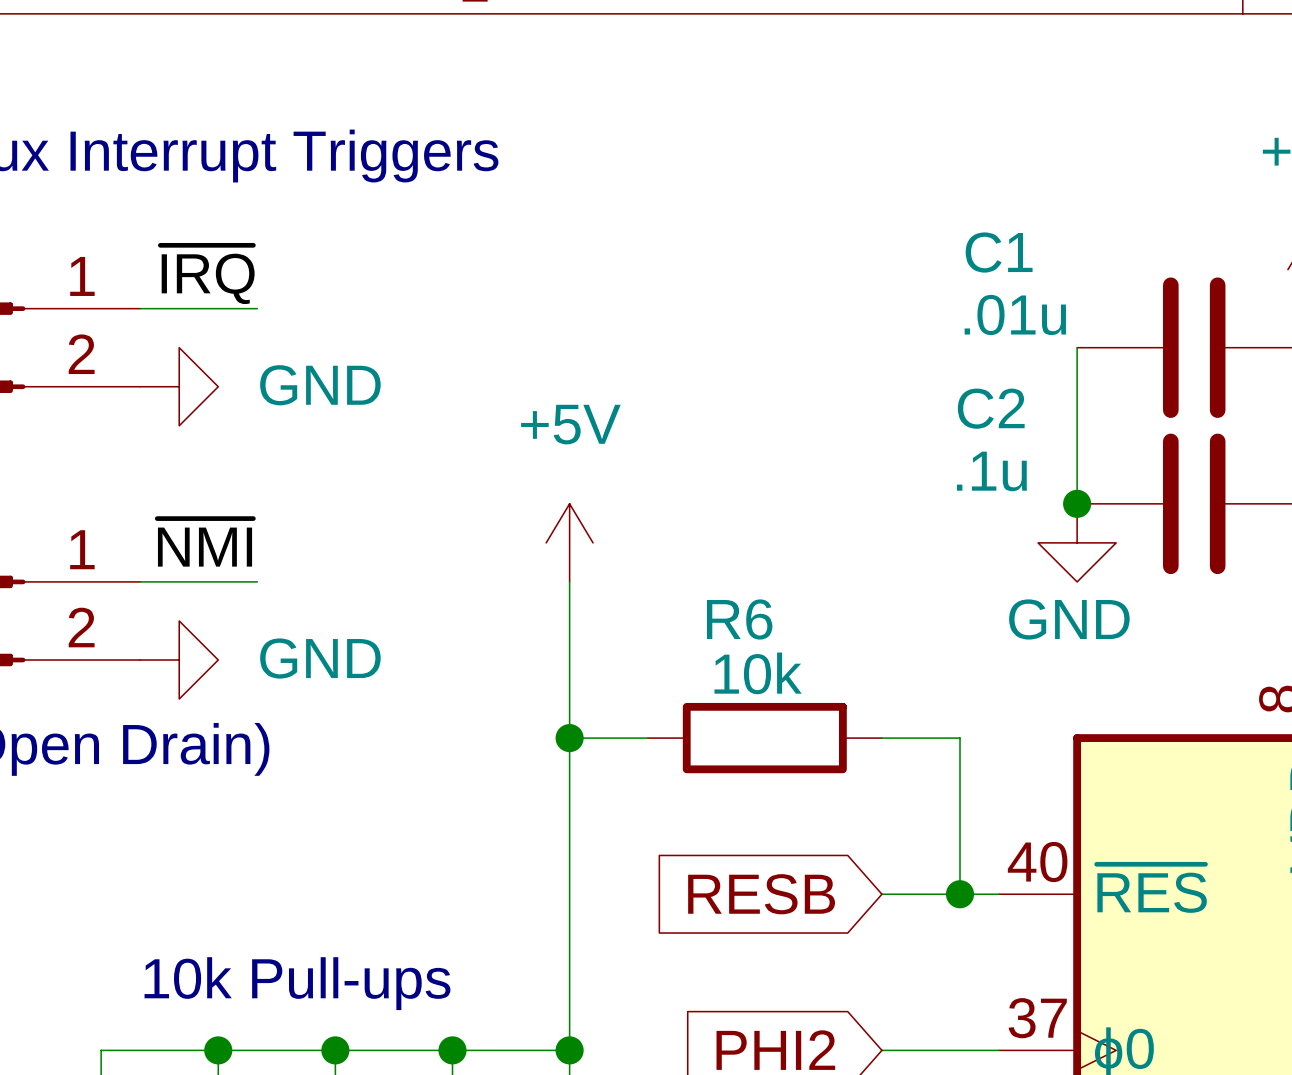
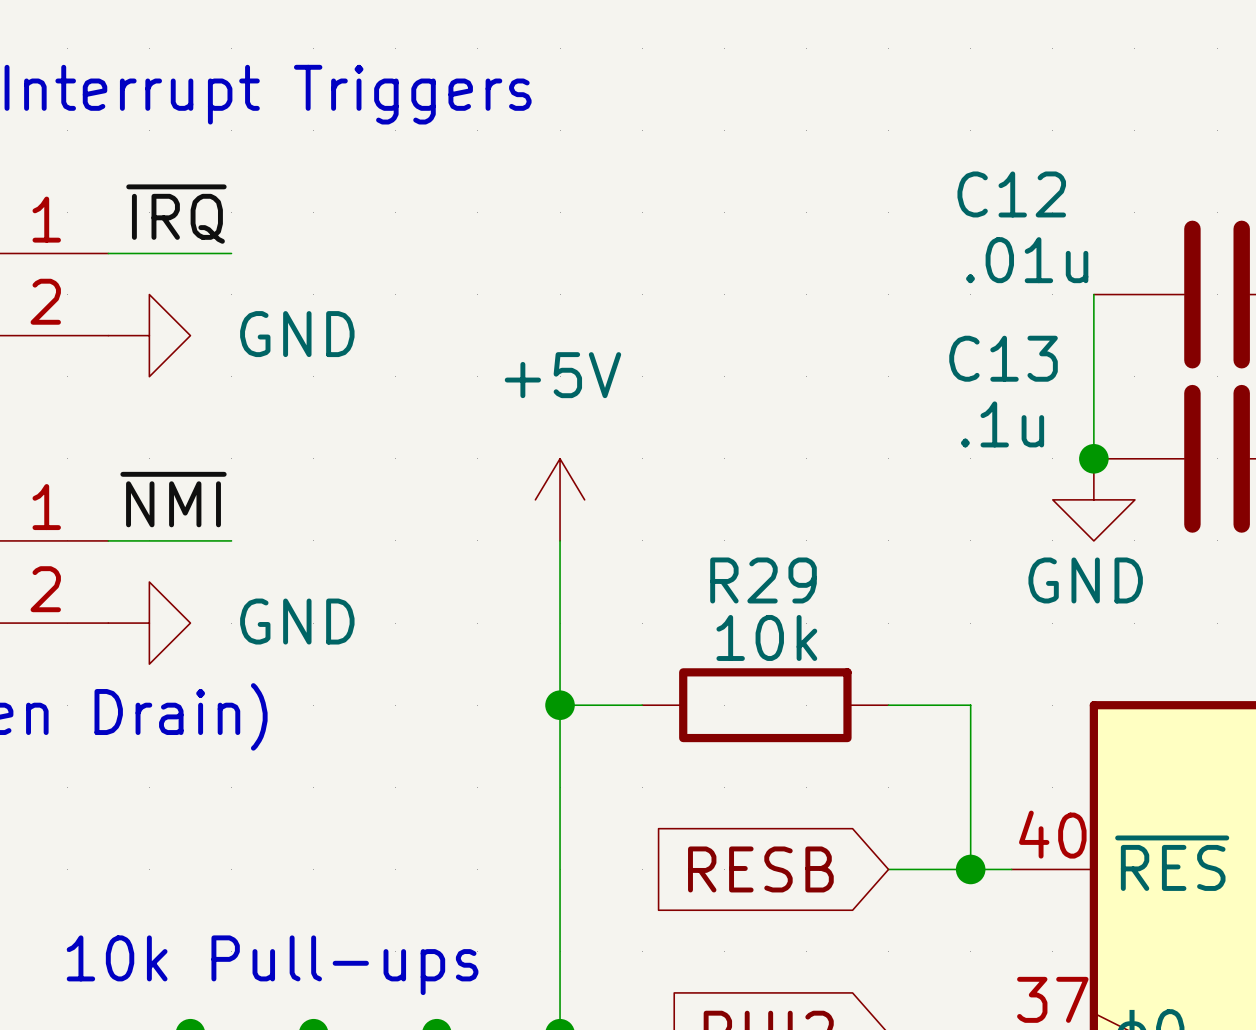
C1 name: C1 (999, 252) -> C12 (1011, 194)
C2 name: C2 (991, 408) -> C13 (1003, 358)
R6 name: R6 (739, 619) -> R29 (763, 580)

